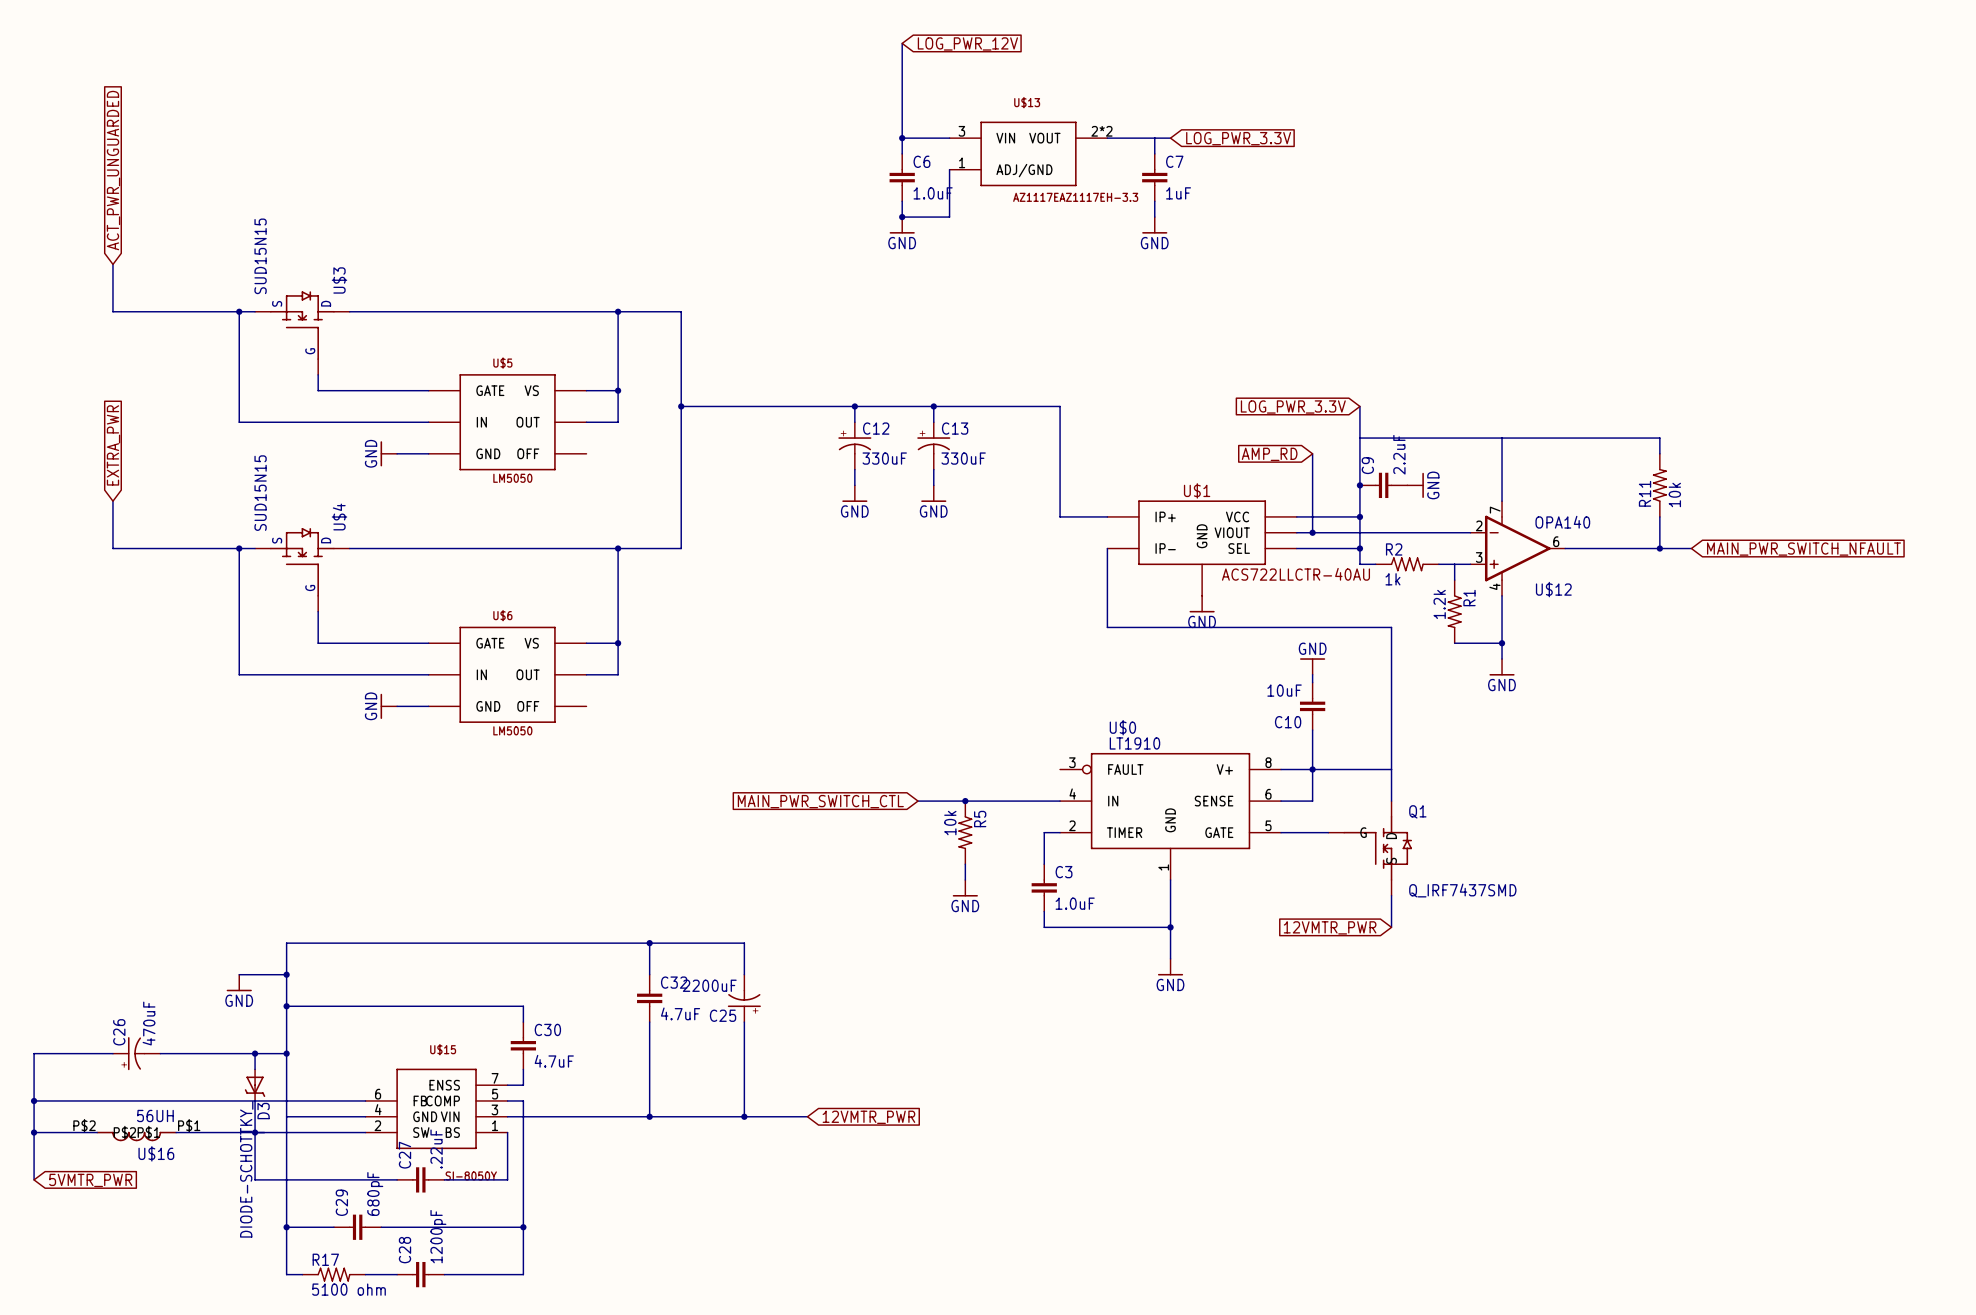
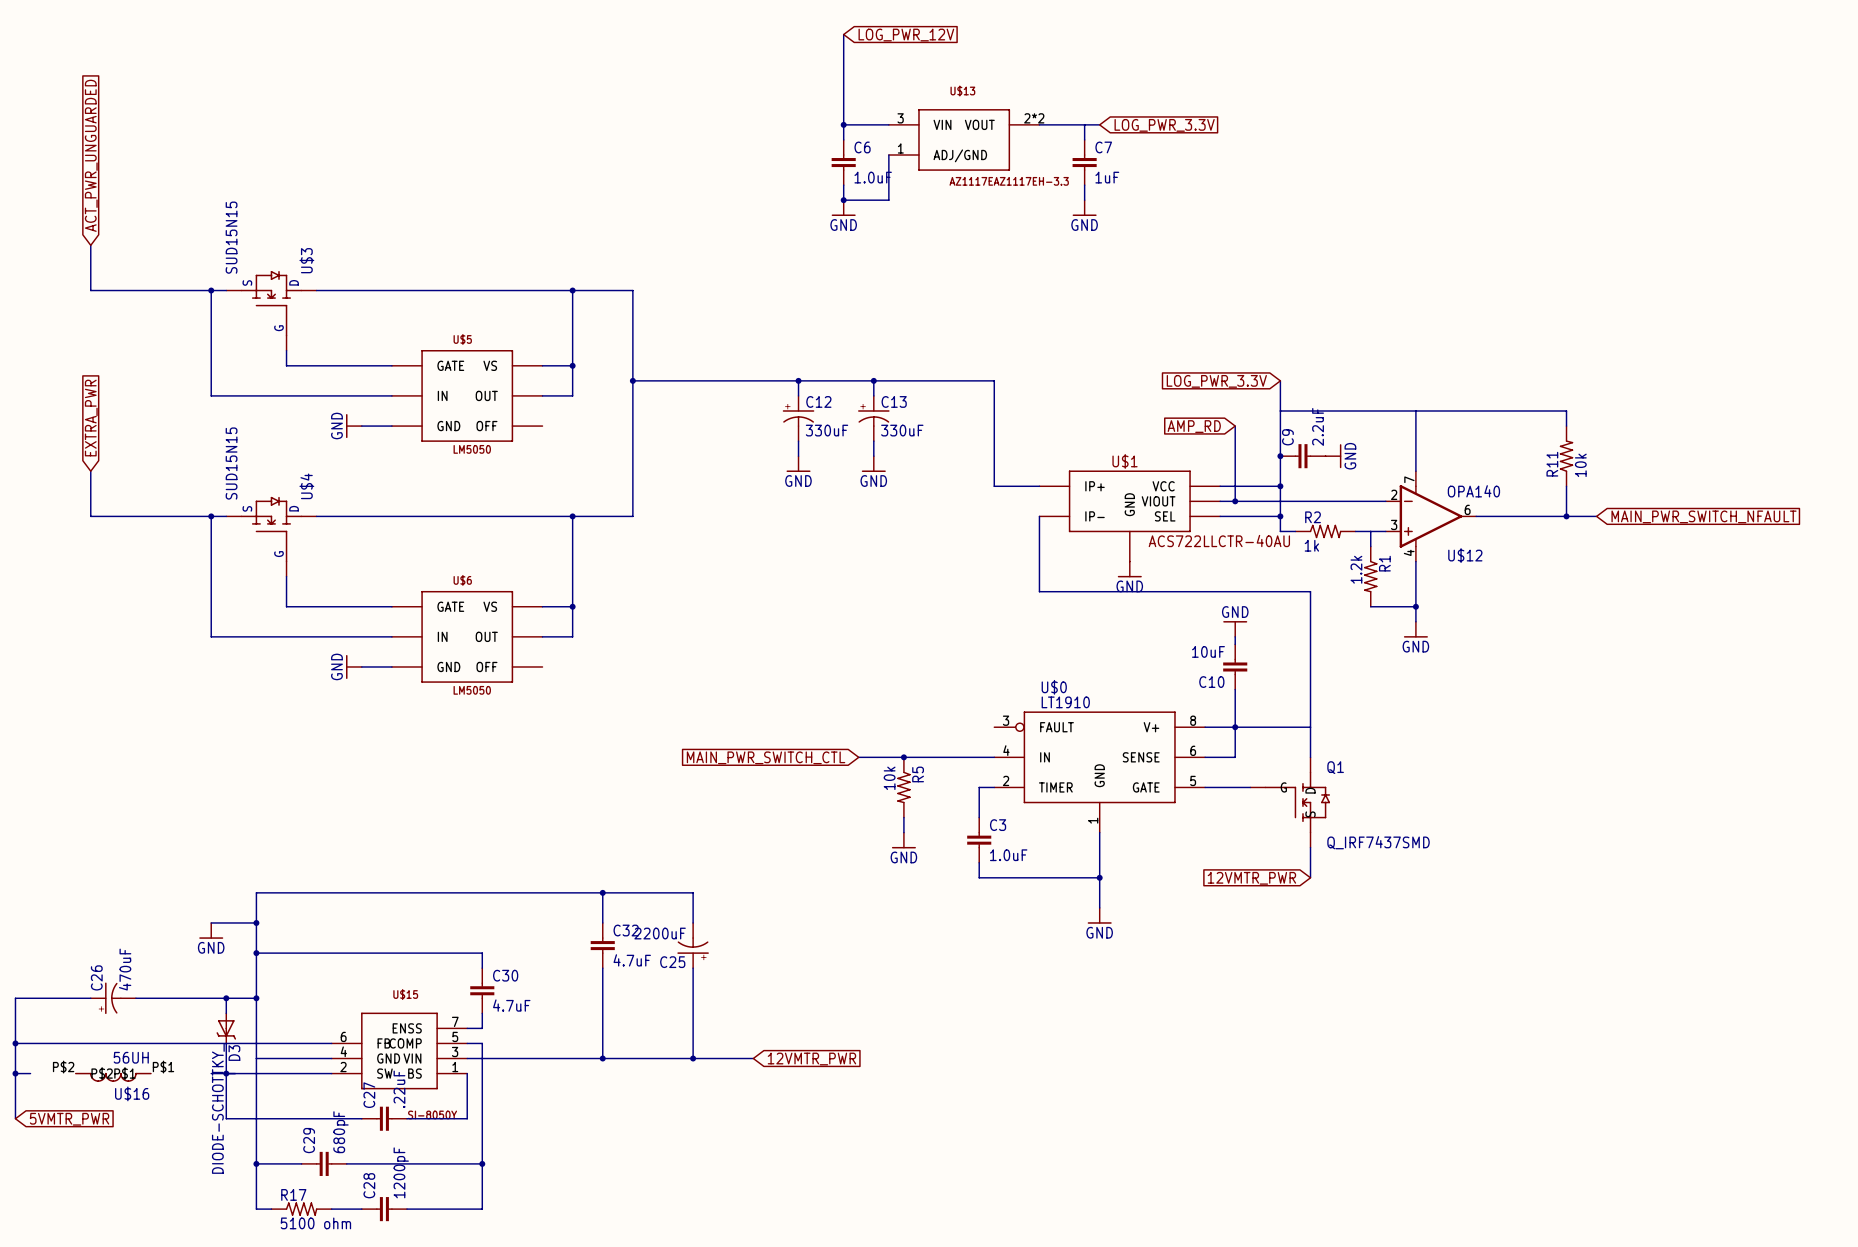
wire: (49, 1132) (97, 1132) -> none
wire: (176, 1132) (239, 1132) -> none

